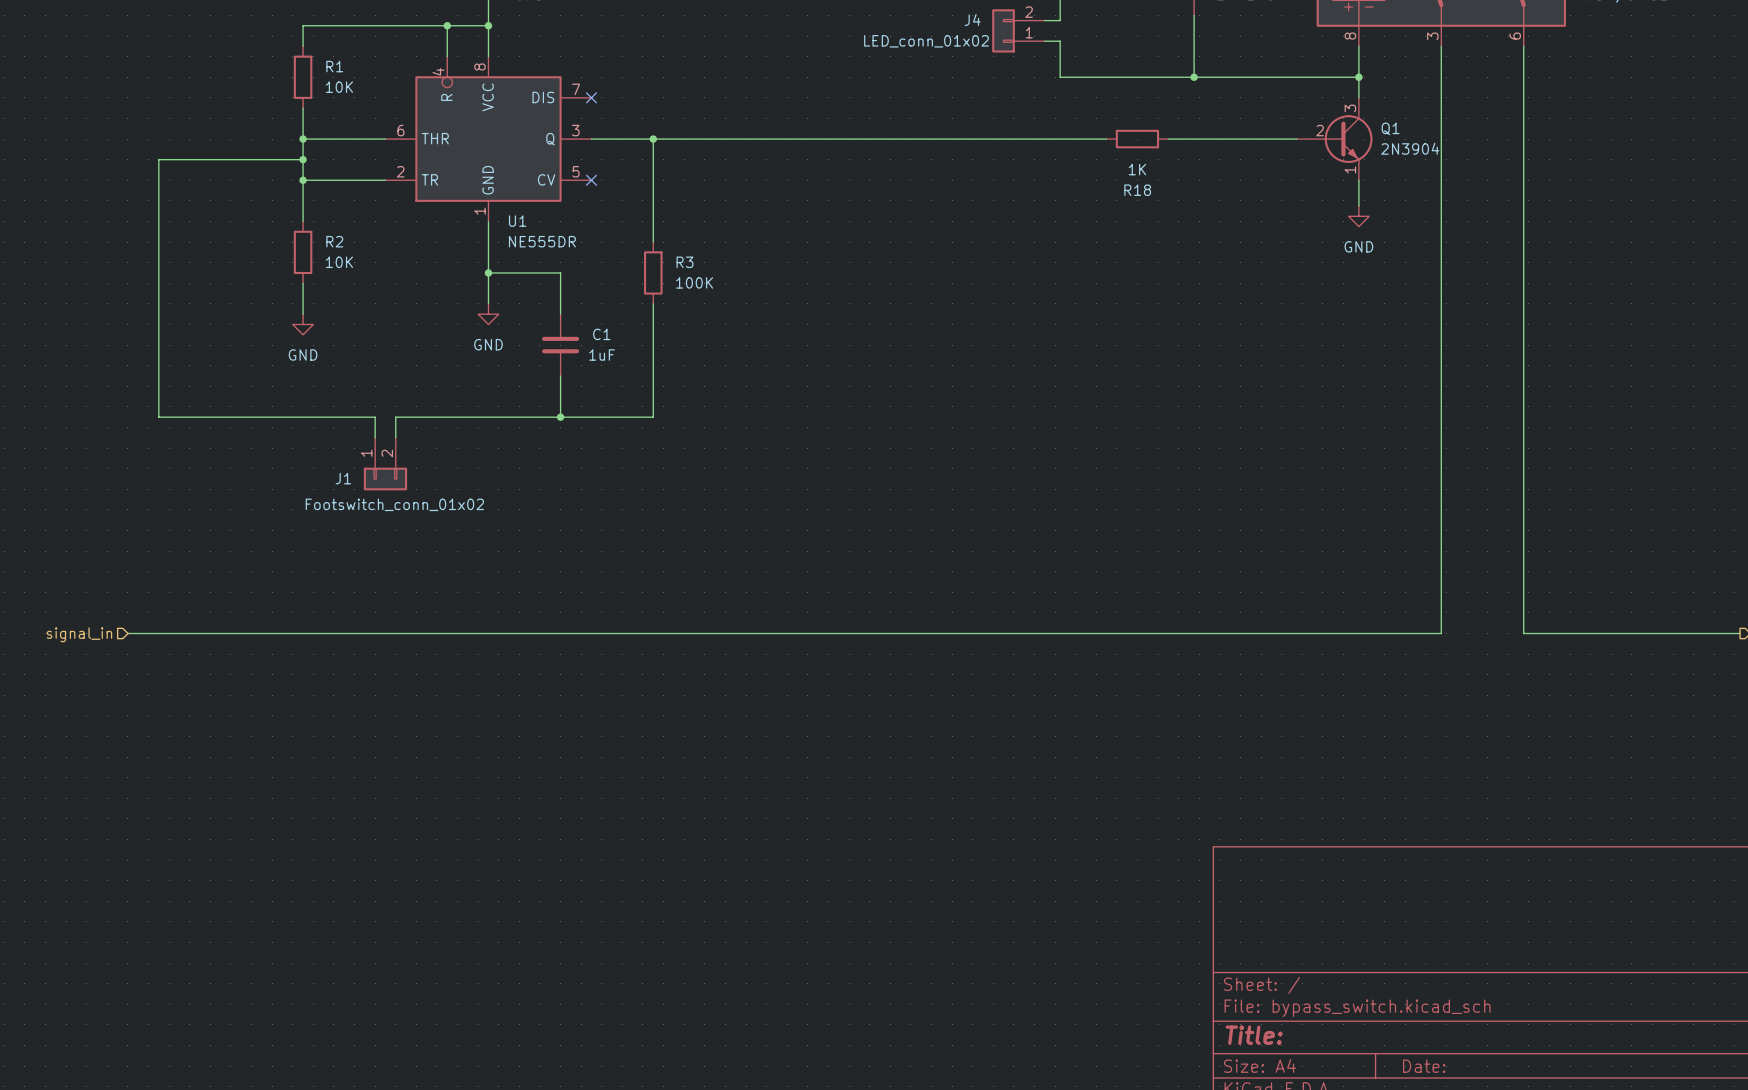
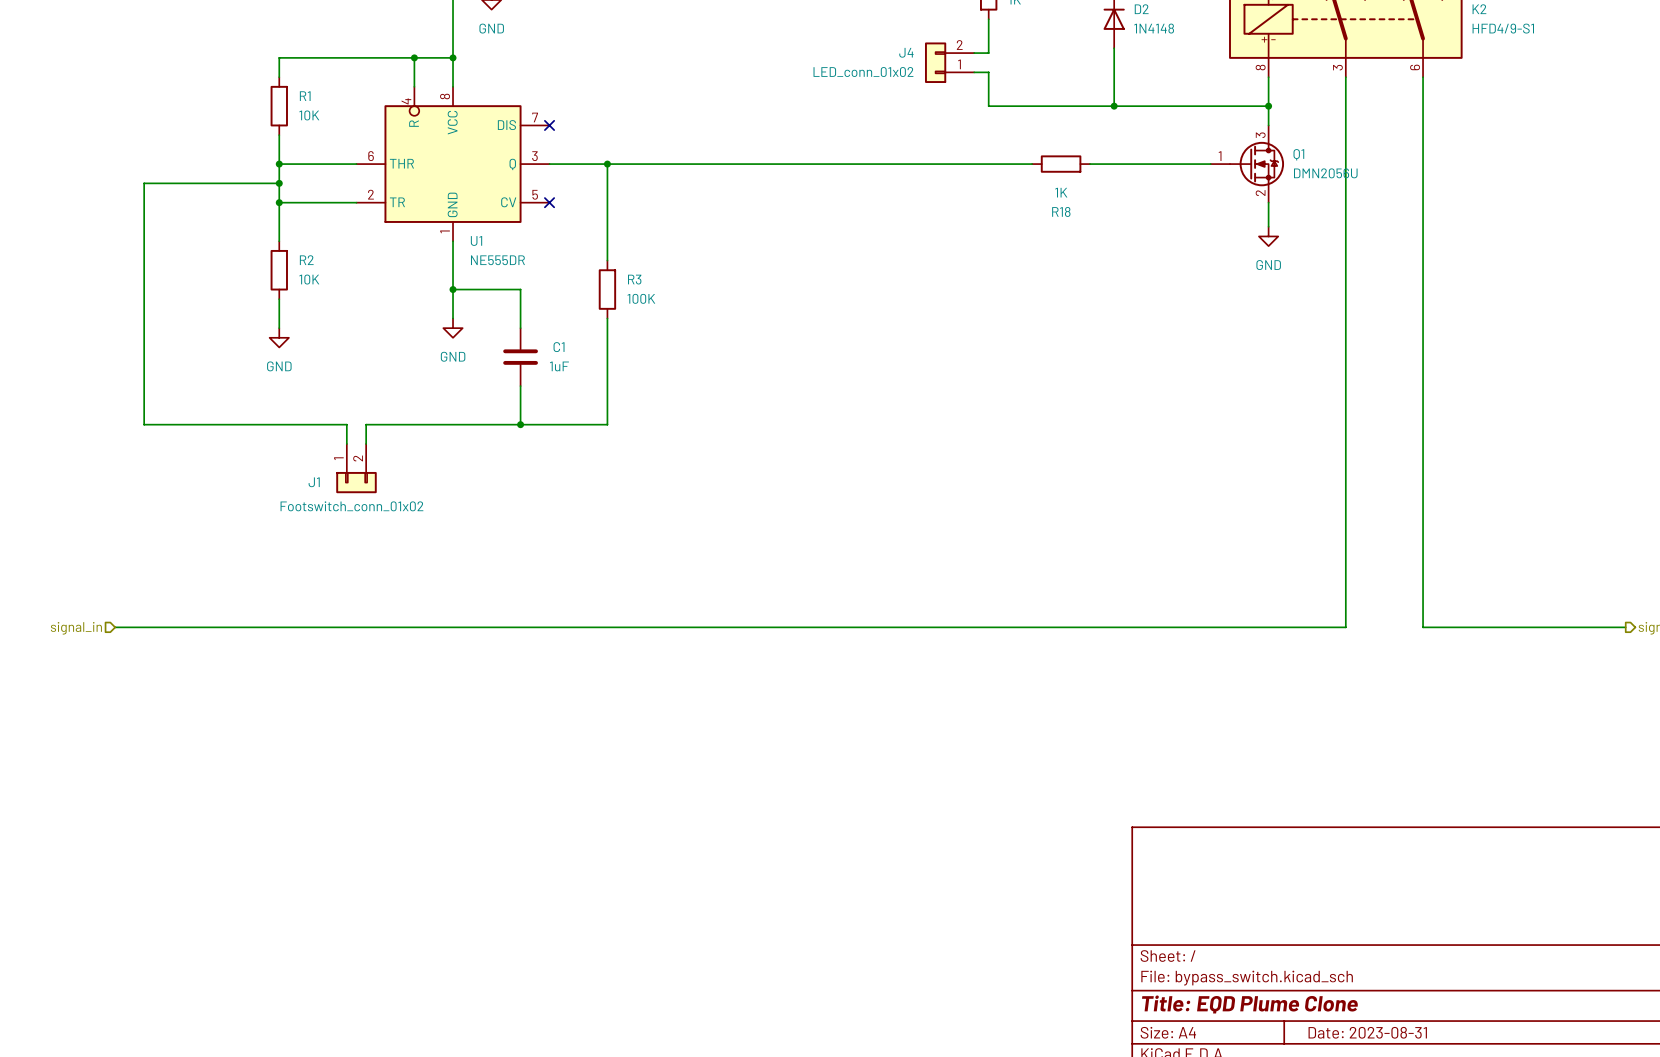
Q1 symbol: [1297, 97, 1373, 181] -> [1210, 125, 1285, 203]
Q1 value: 2N3904 (1410, 148) -> DMN2056U (1325, 173)
title block: Title: (1254, 1035) -> Title: EQD Plume Clone (1249, 1004)
title block: Date: (1424, 1066) -> Date: 2023-08-31 (1367, 1032)

